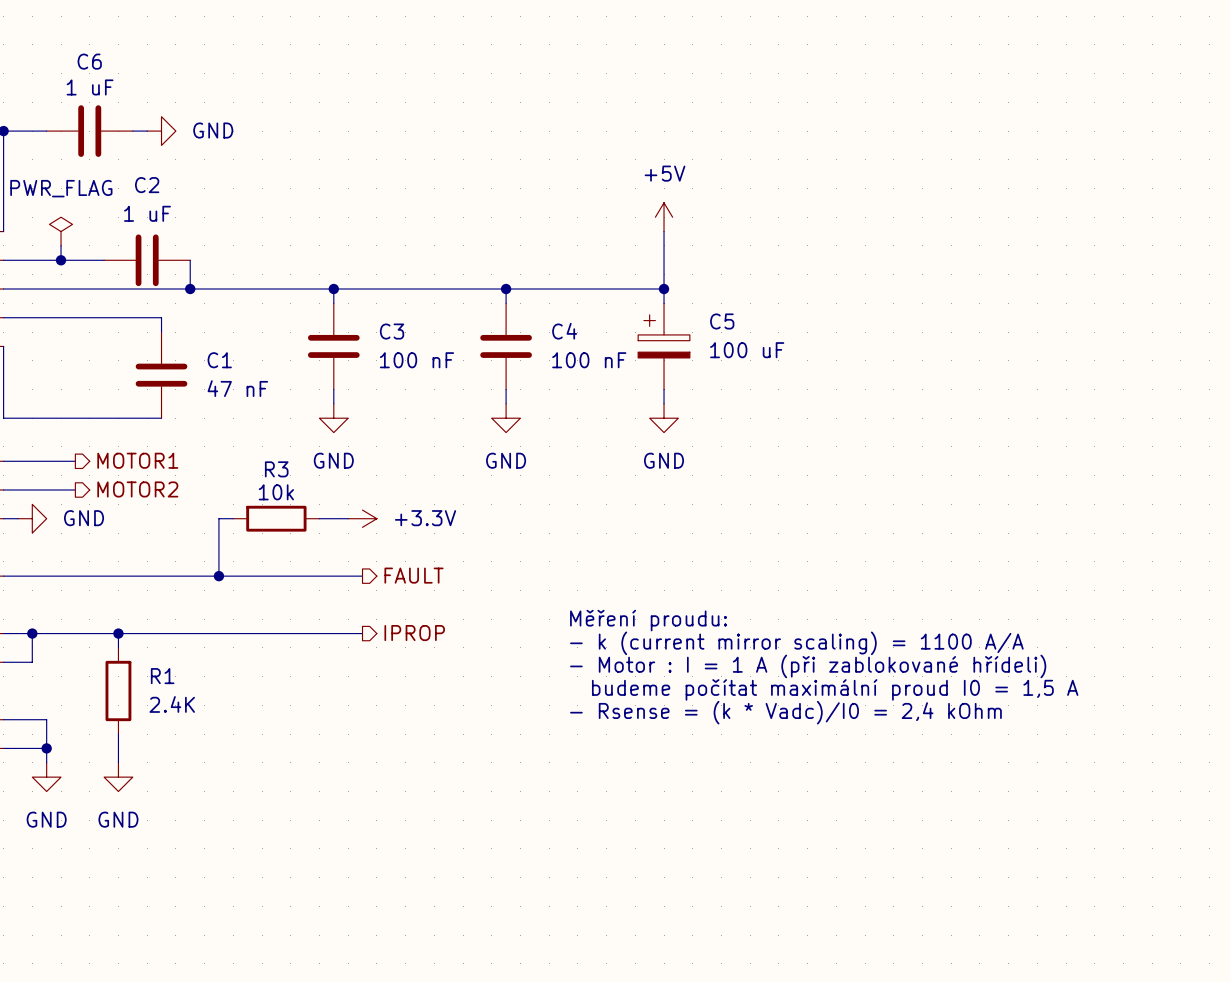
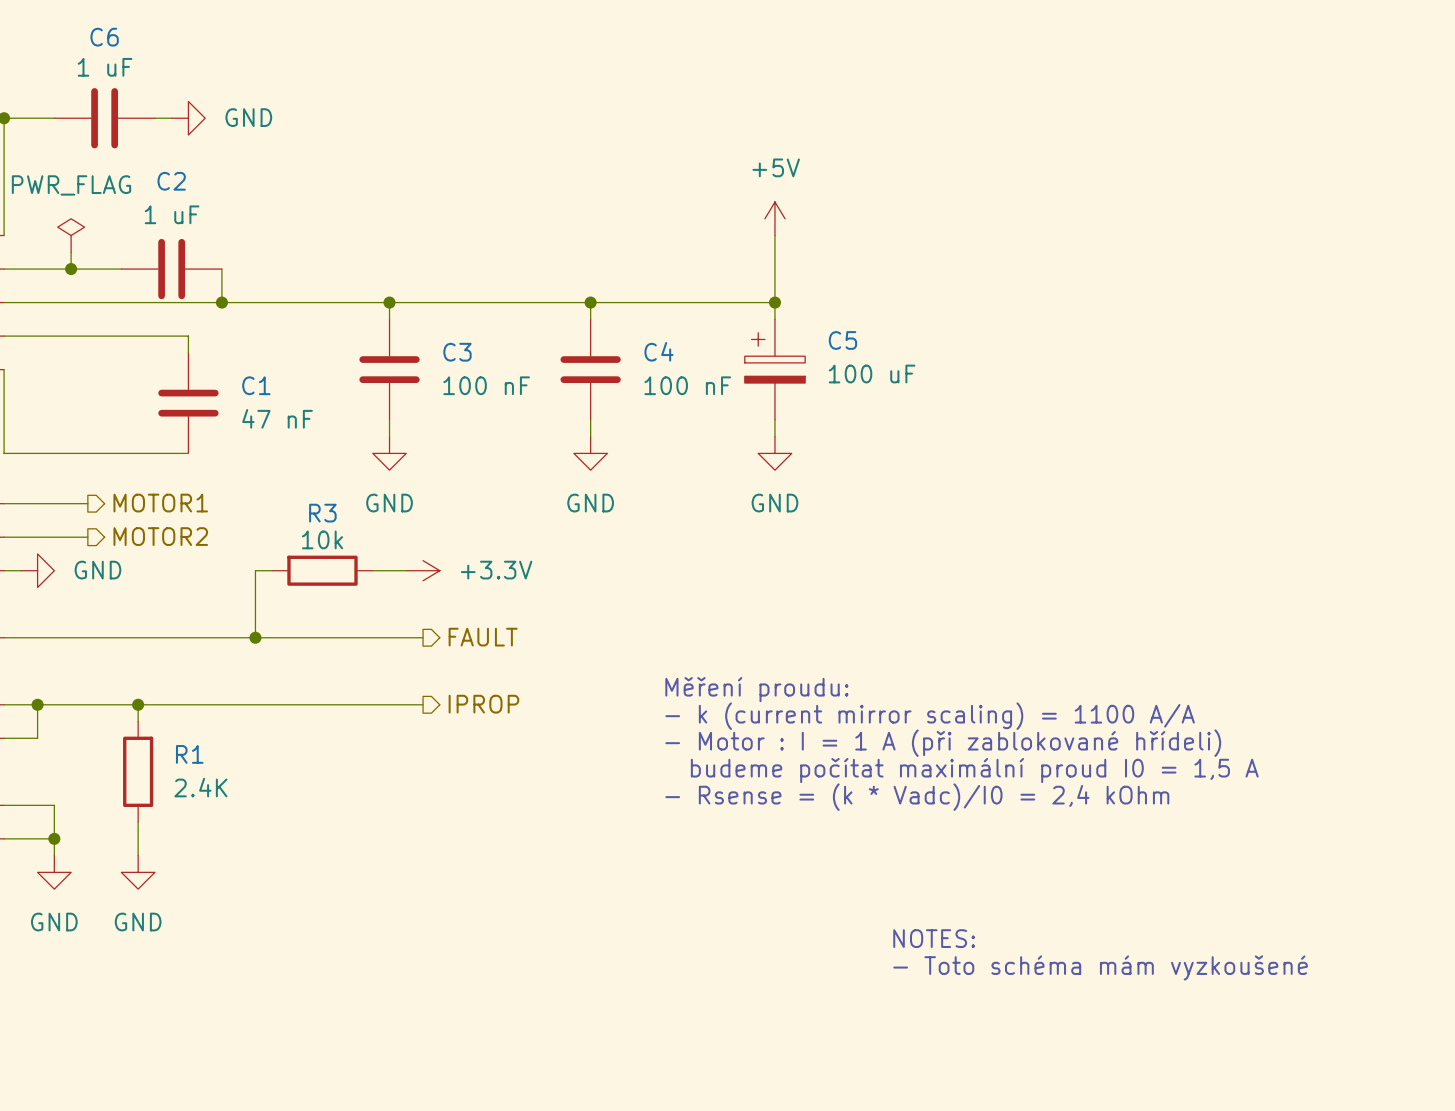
text: none -> NOTES: (934, 938)
text: none -> - Toto schéma mám vyzkoušené (1100, 967)

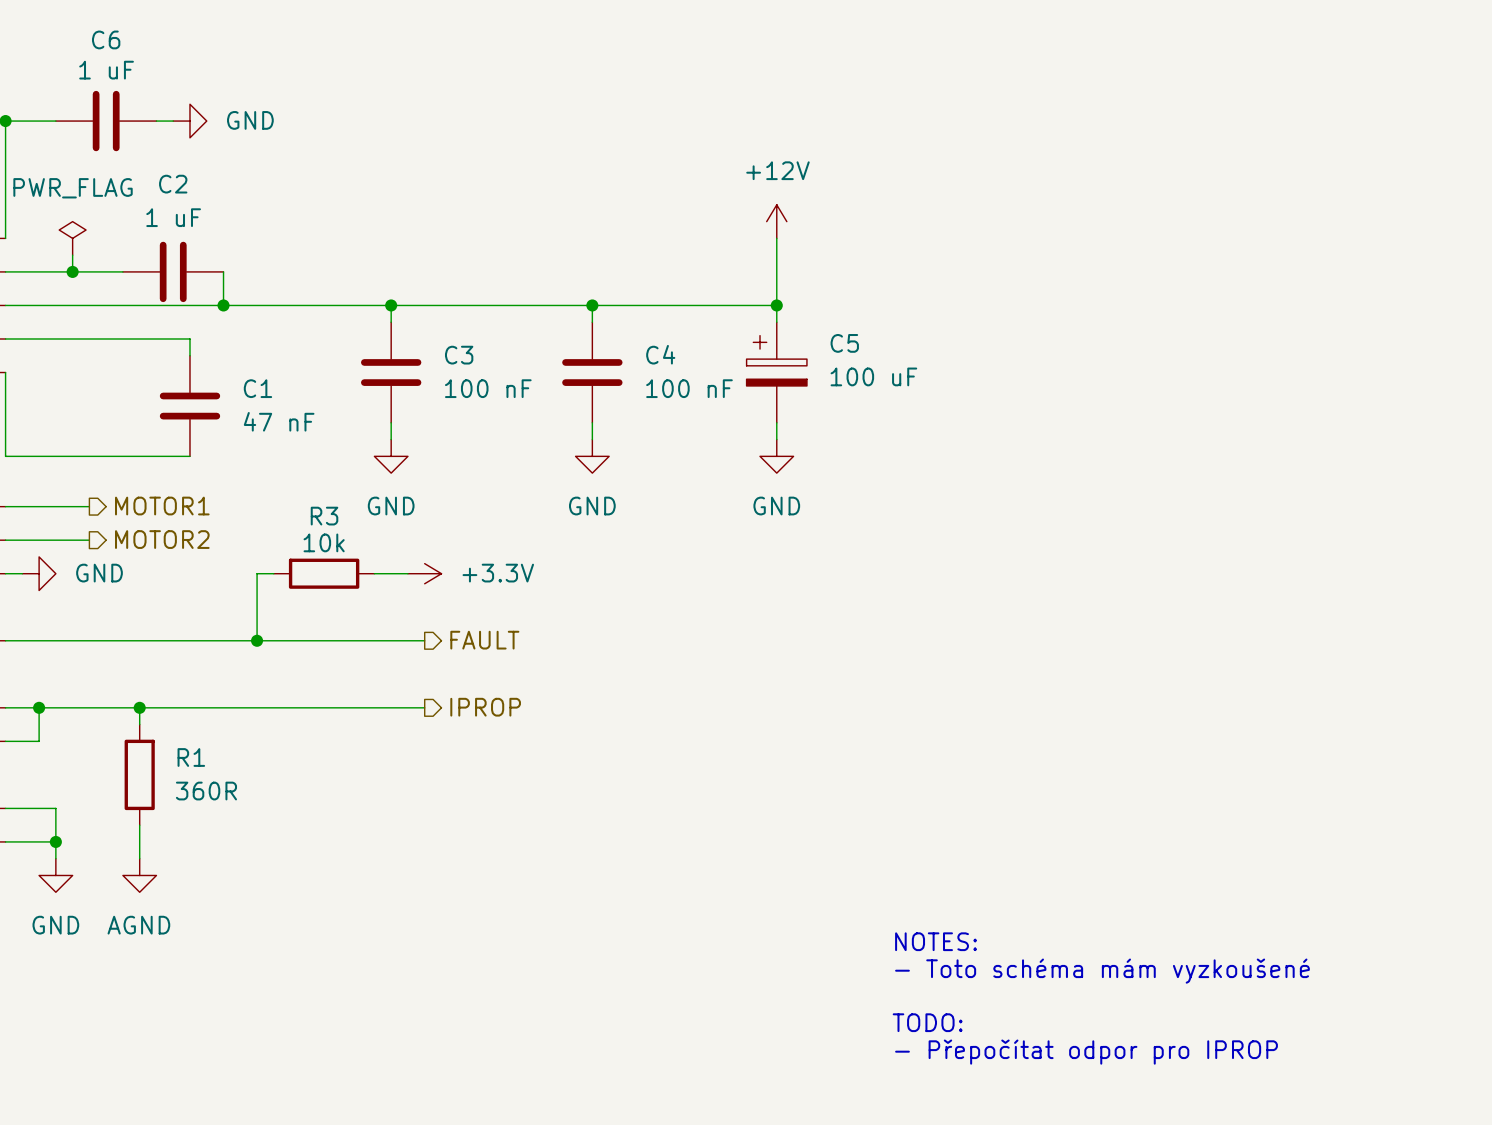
power symbol: +5V (774, 218) -> +12V (776, 221)
text: Měření proudu: (756, 689) -> none
text: - k (current mirror scaling) = 1100 A/A (930, 716) -> none
text: - Motor : I = 1 A (při zablokované hřídeli) (943, 743) -> none
text: budeme počítat maximální proud I0 = 1,5 A (974, 770) -> none
R1 value: 2.4K (200, 787) -> 360R (206, 791)
text: - Rsense = (k * Vadc)/I0 = 2,4 kOhm (917, 797) -> none
power symbol: GND (138, 872) -> AGND (139, 875)
text: none -> TODO: (927, 1022)
text: none -> - Přepočítat odpor pro IPROP (1086, 1052)

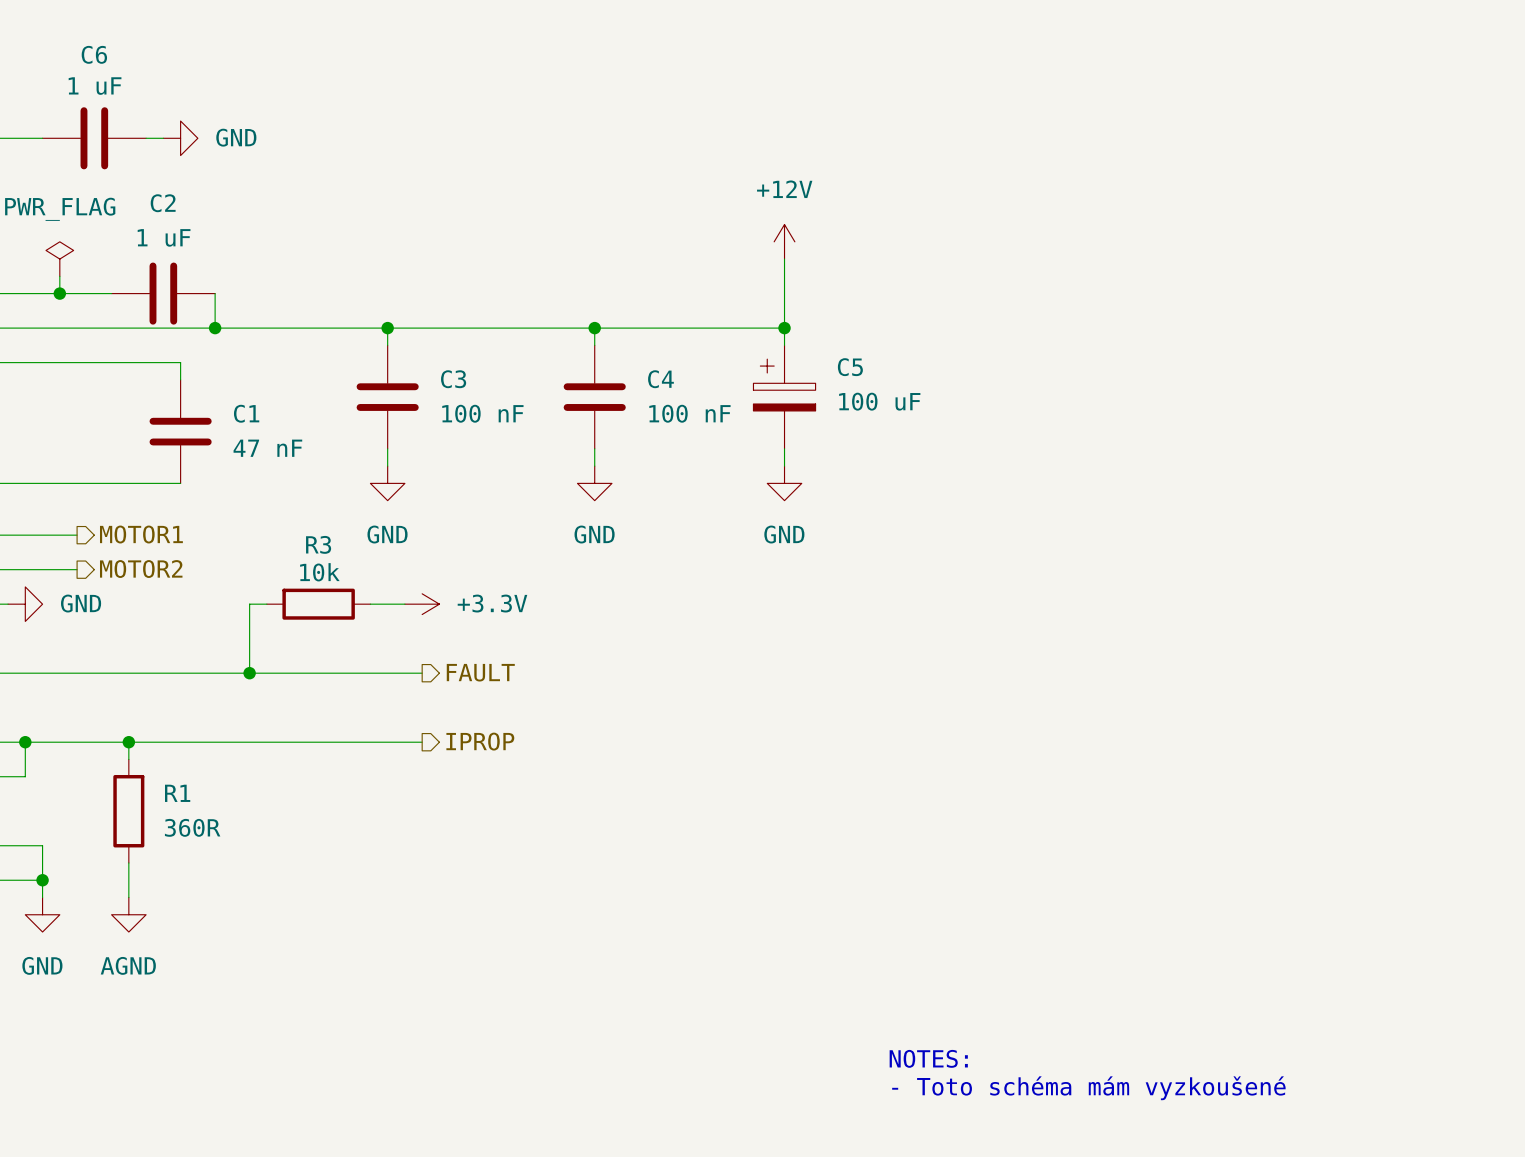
text position: NOTES: (936, 941) -> NOTES: (928, 1058)
text position: - Toto schéma mám vyzkoušené (1102, 971) -> - Toto schéma mám vyzkoušené (1088, 1088)
text: TODO: (927, 1022) -> none
text: - Přepočítat odpor pro IPROP (1086, 1052) -> none

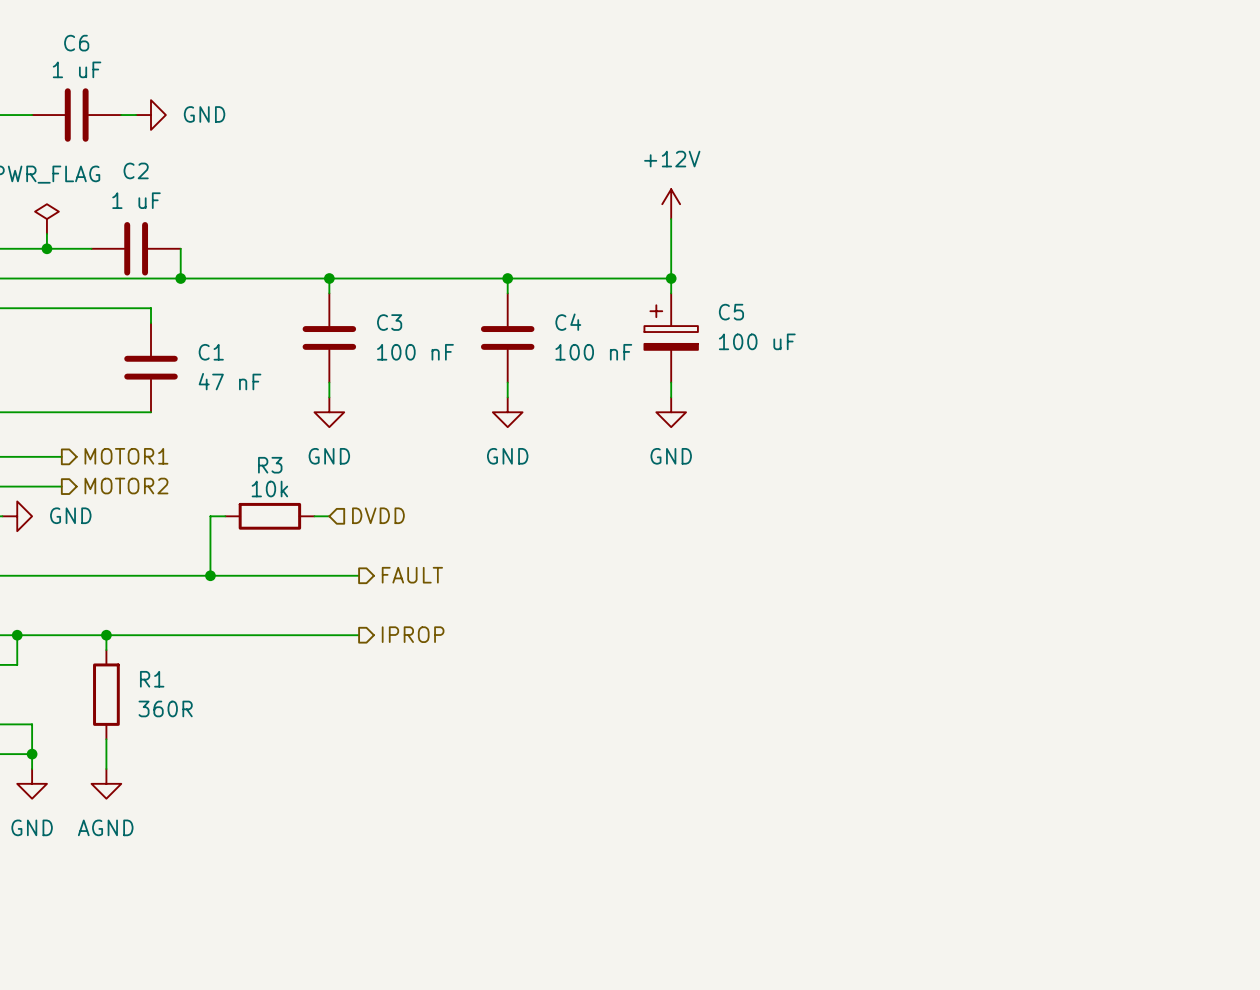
hierarchical label: none -> DVDD (378, 515)
wire: (387, 604) (404, 604) -> none
power symbol: +3.3V (422, 604) -> none
text: NOTES: (928, 1058) -> none
text: - Toto schéma mám vyzkoušené (1088, 1088) -> none

